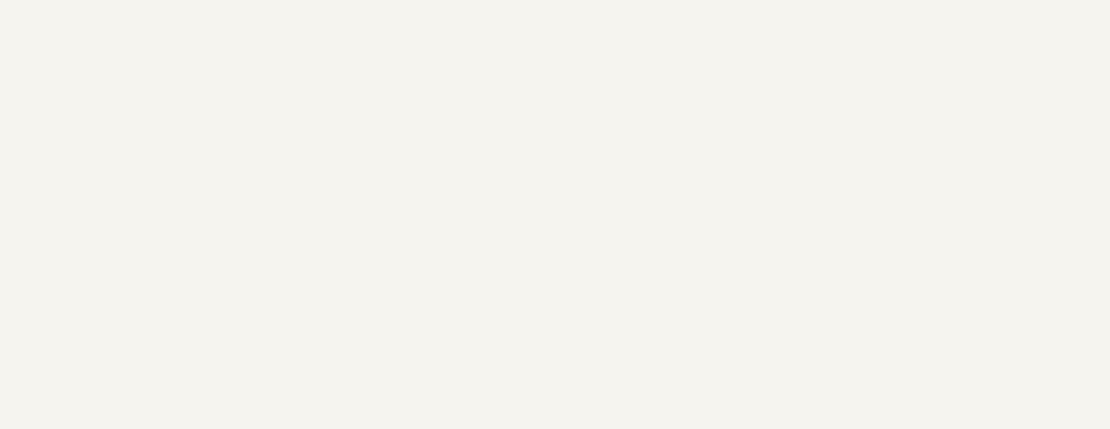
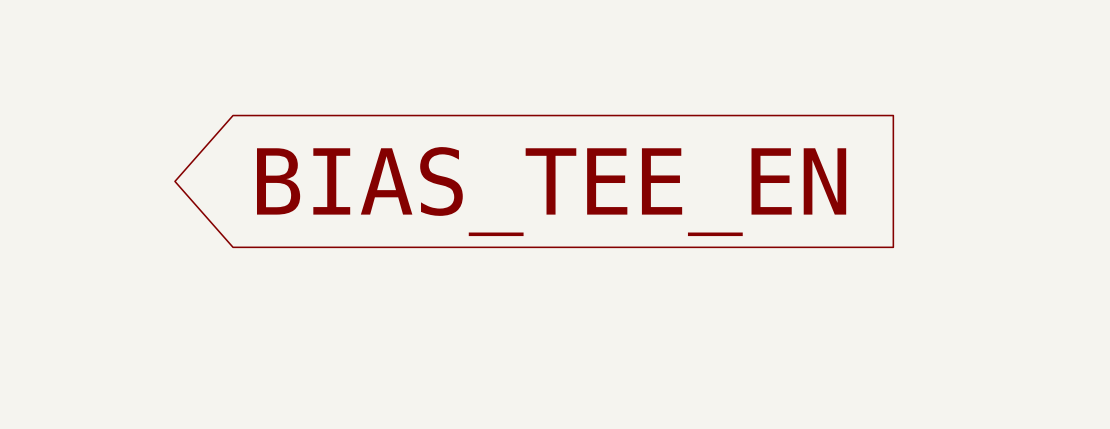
global label: none -> BIAS_TEE_EN (551, 191)

